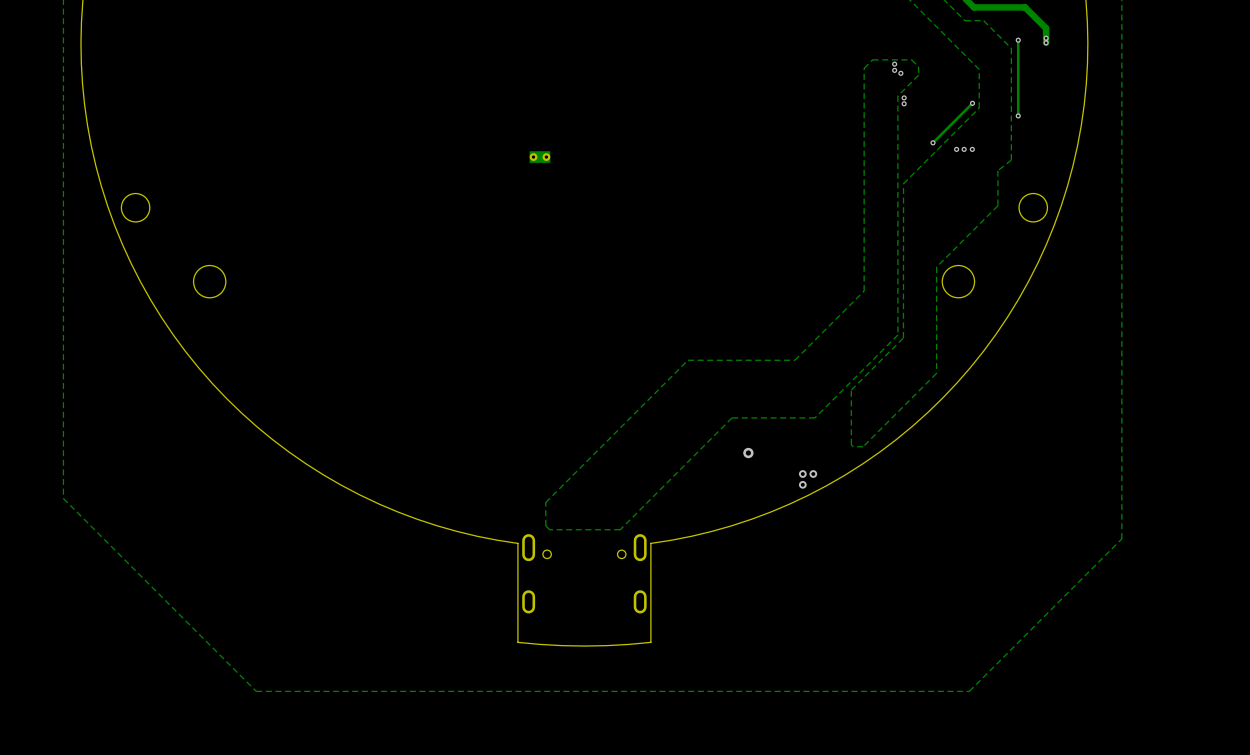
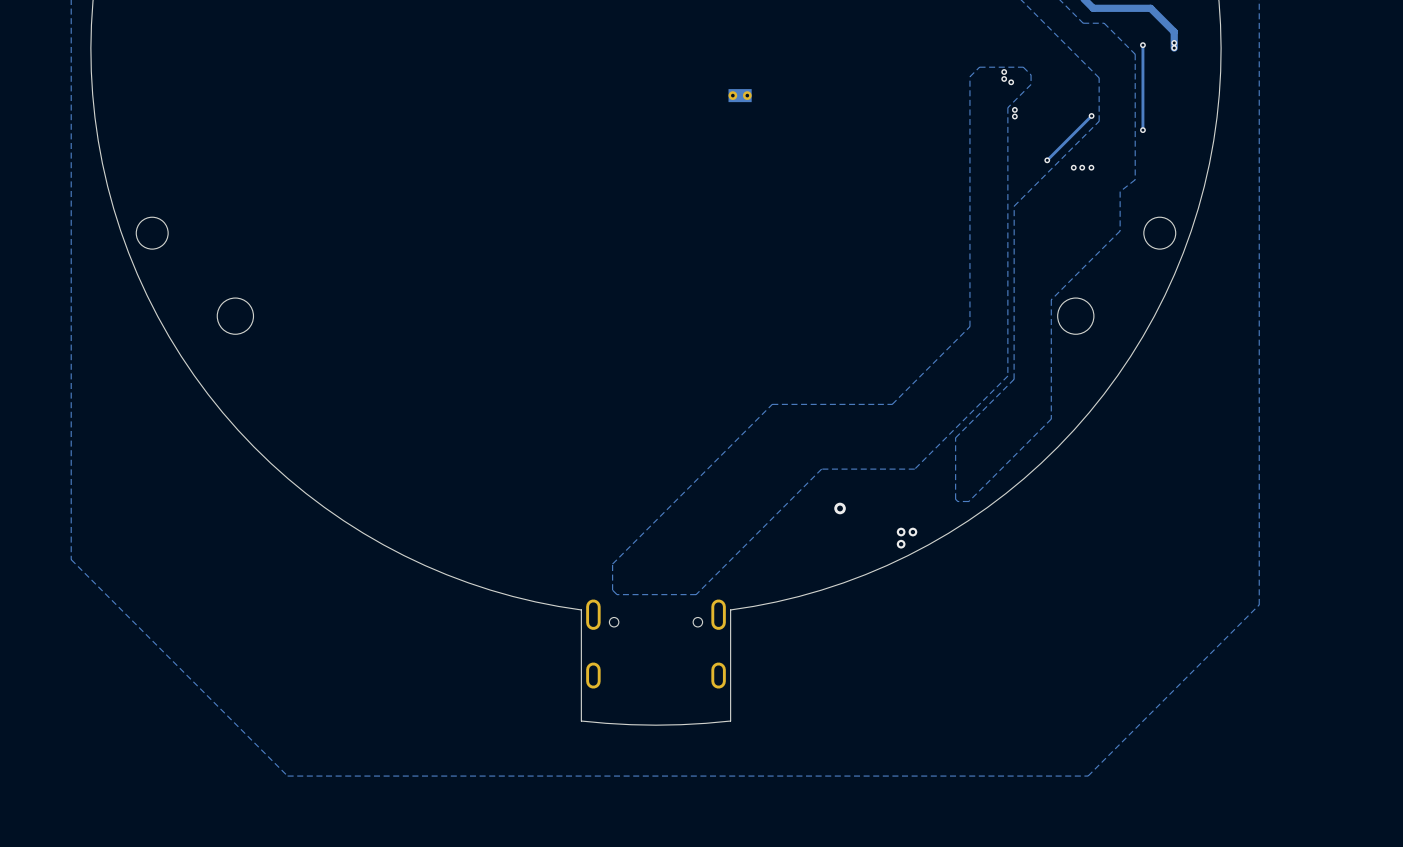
part position: (539, 157) -> (740, 95)

